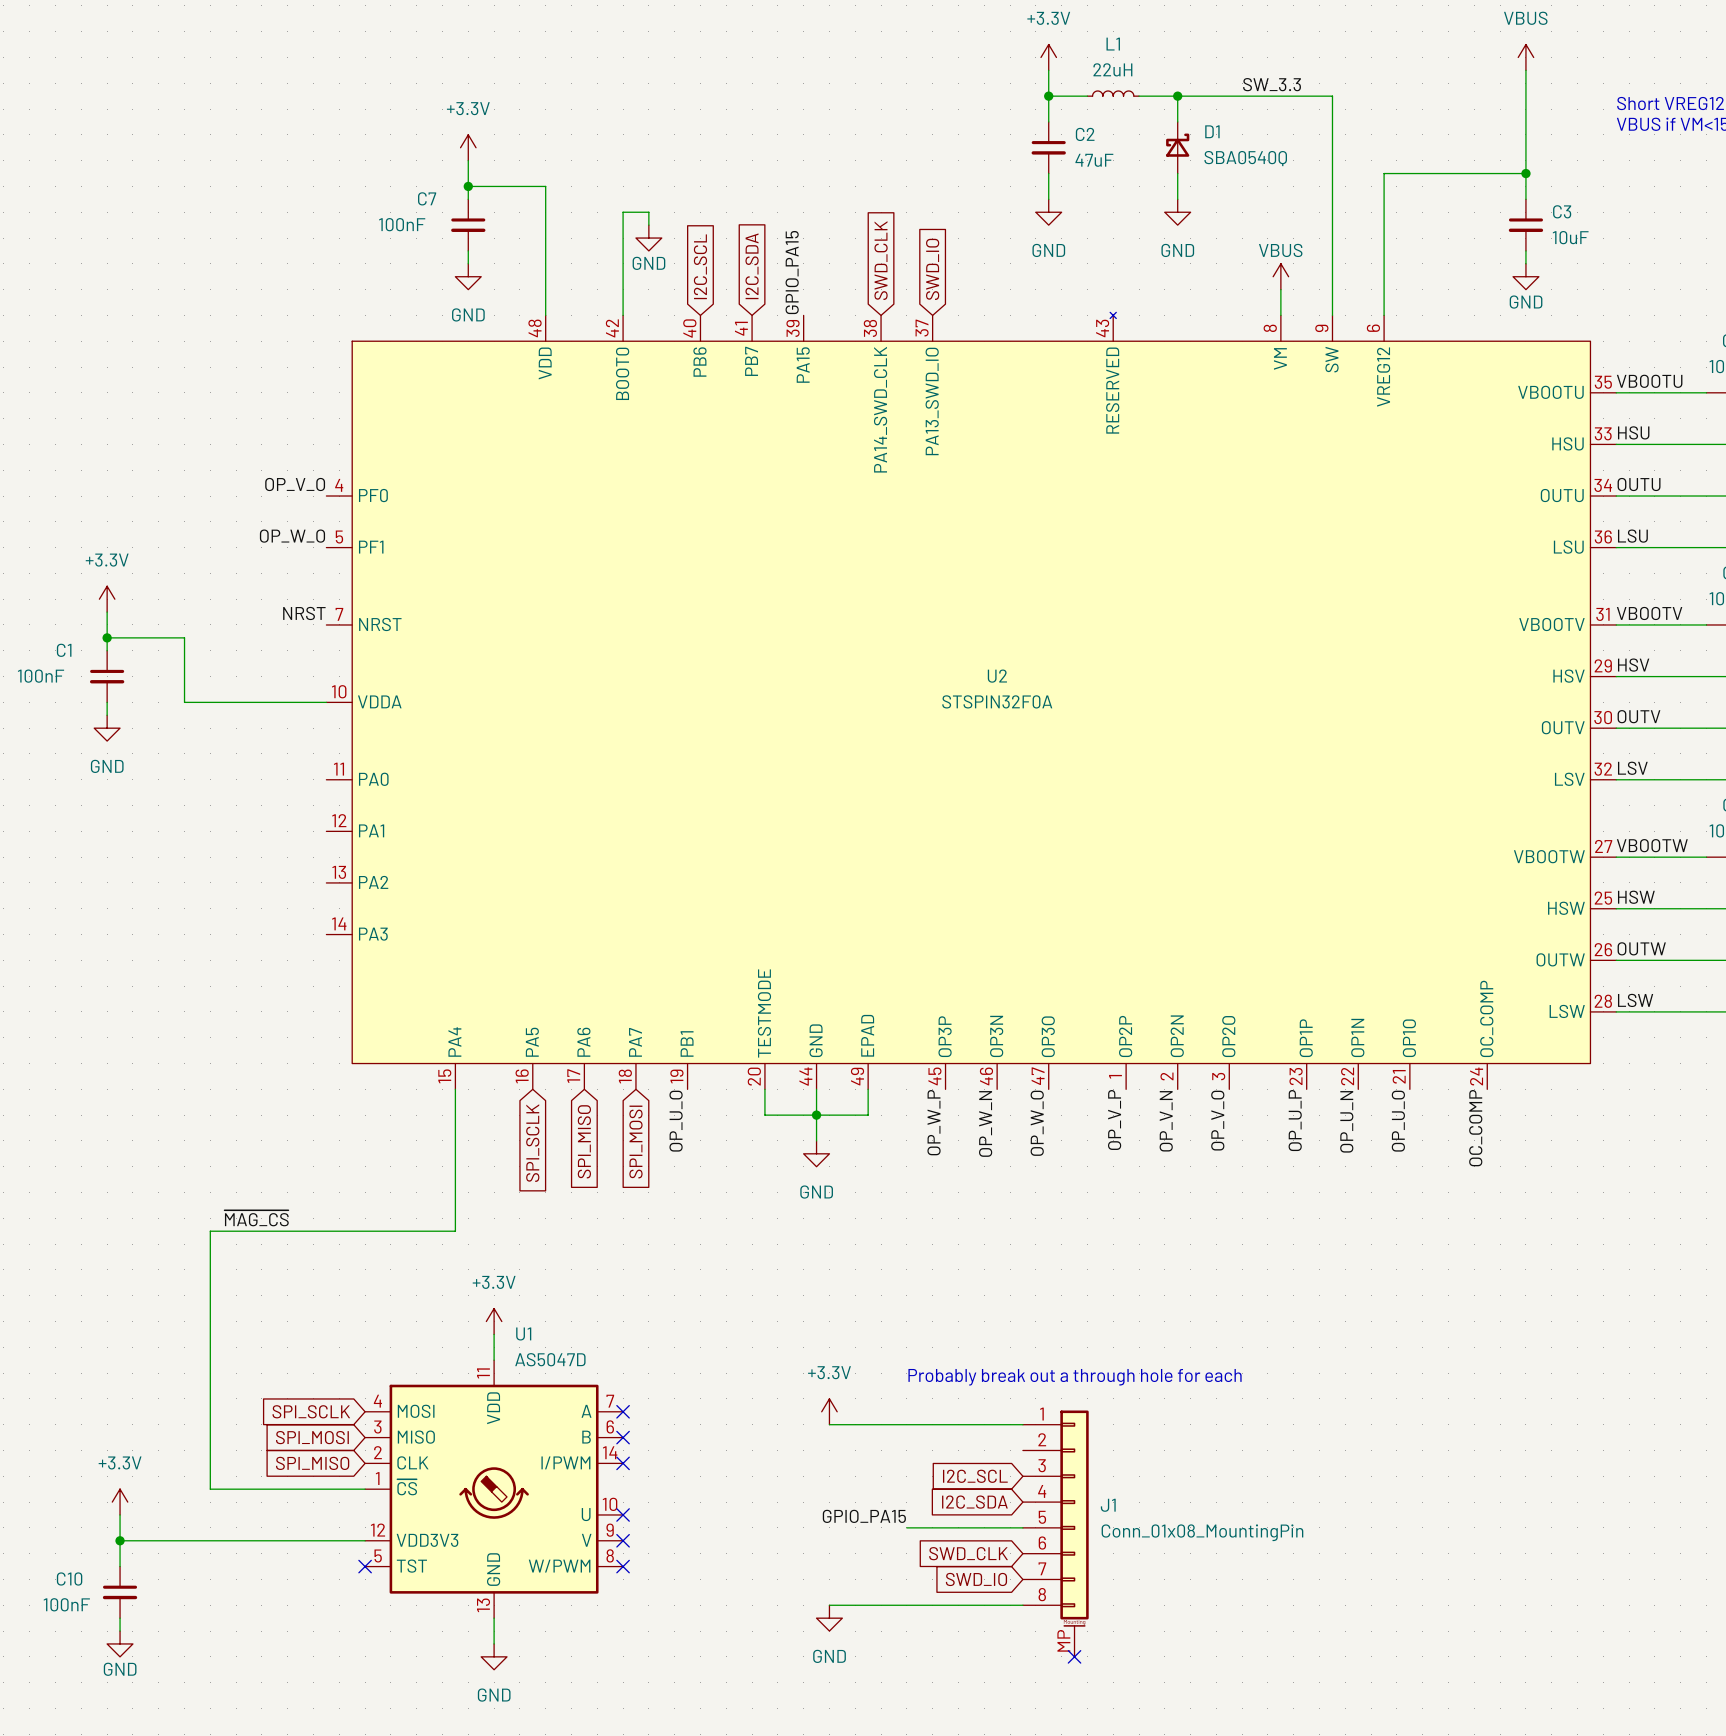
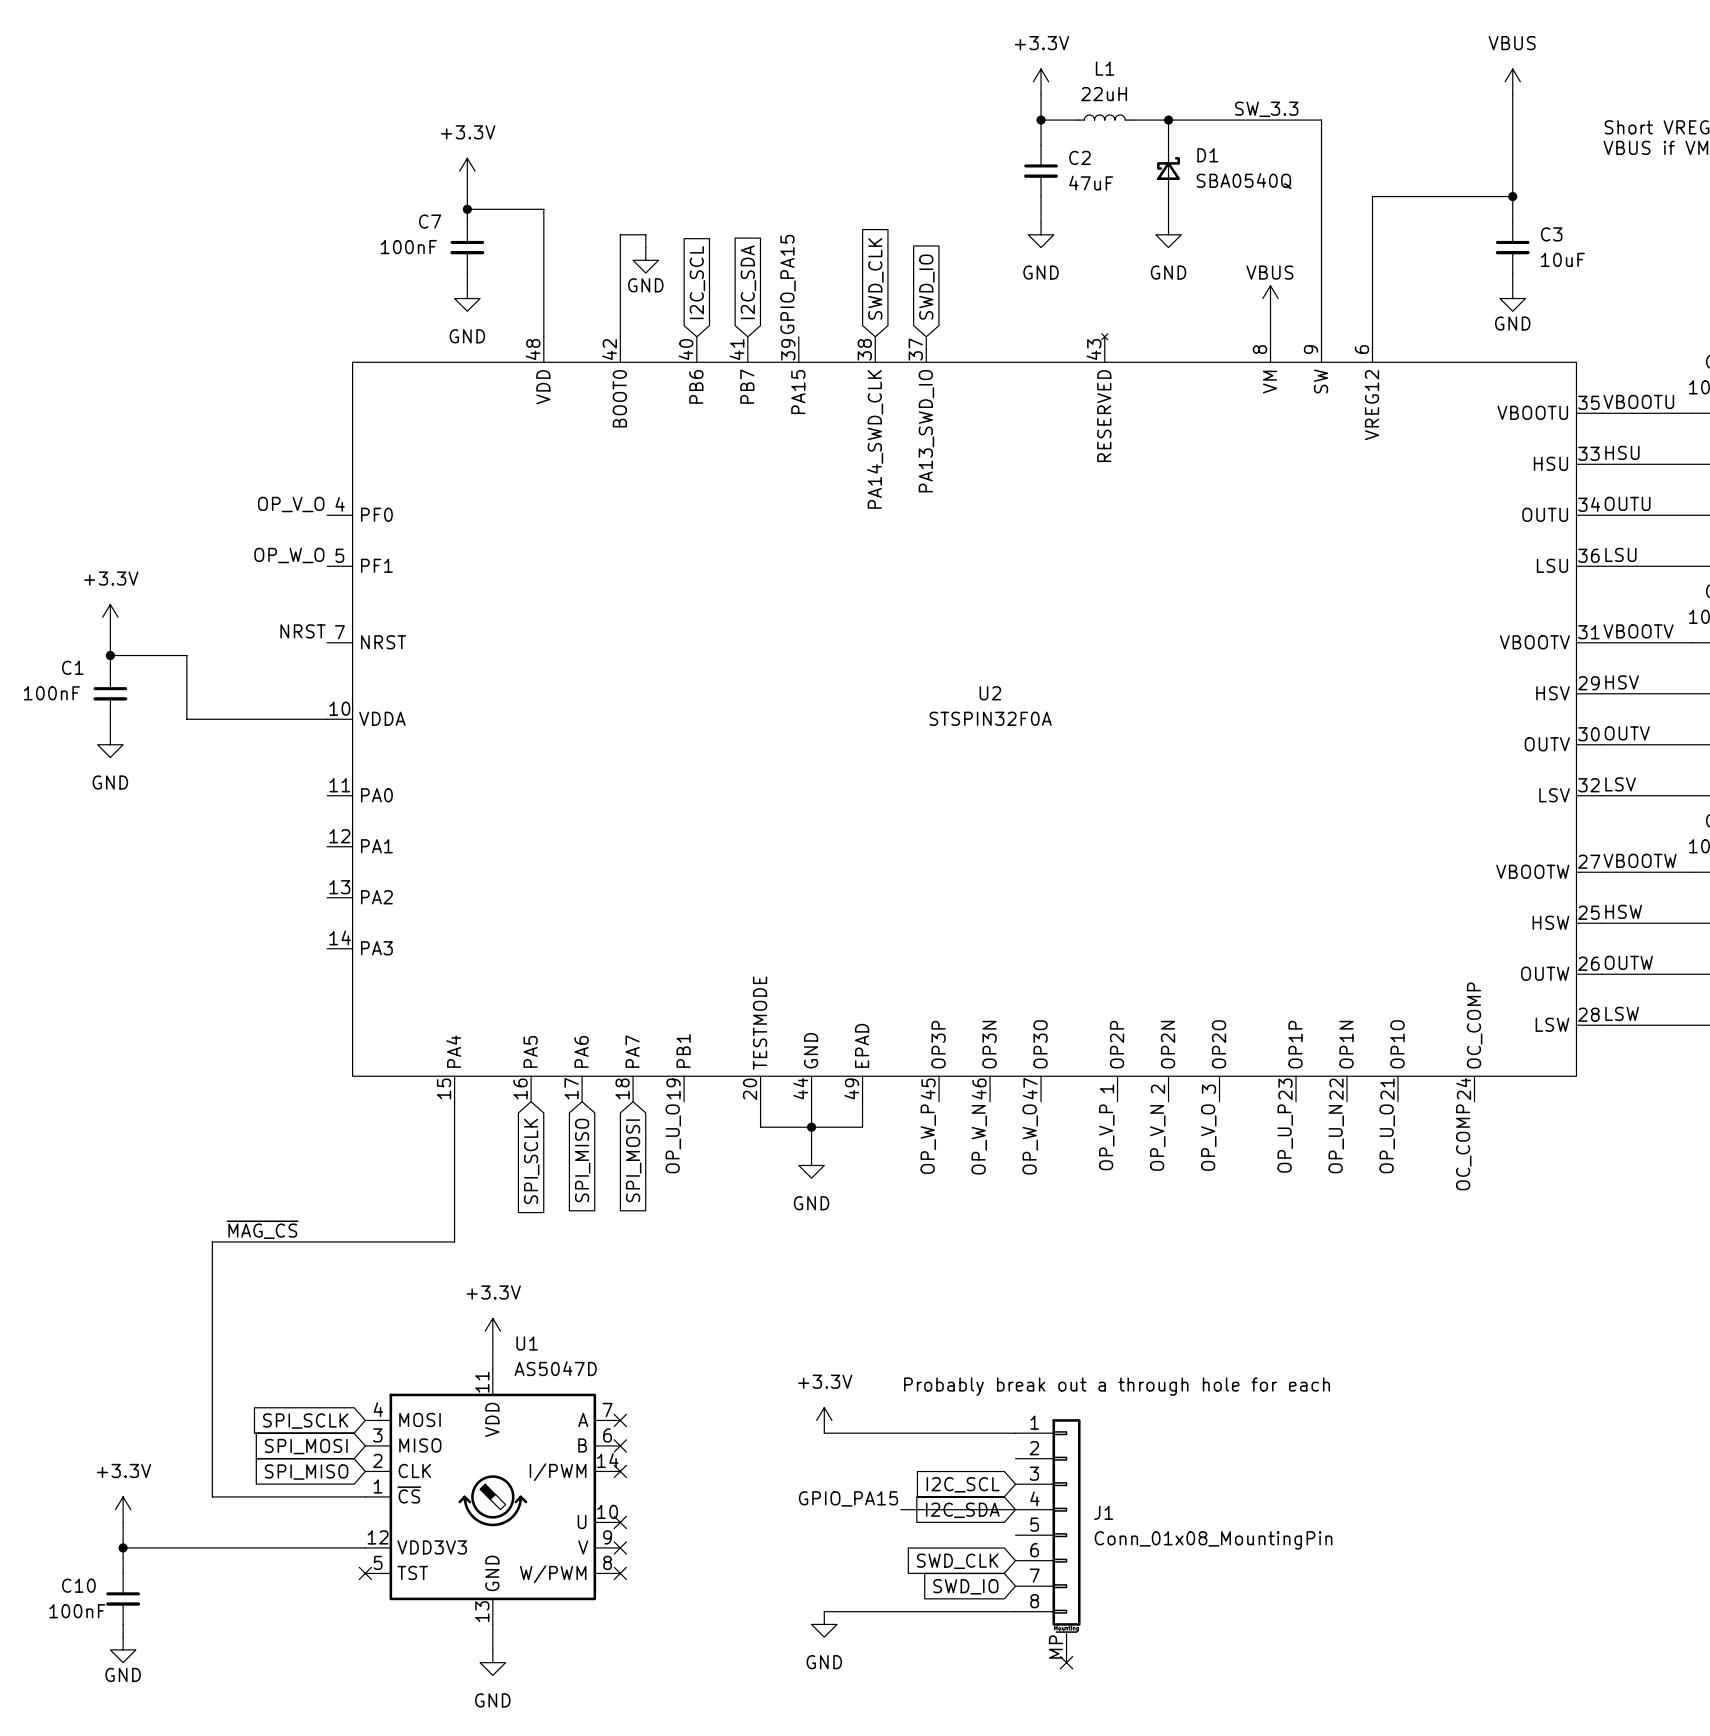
label position: GPIO_PA15 (864, 1516) -> GPIO_PA15 (848, 1498)
wire: (906, 1527) (1022, 1527) -> (900, 1509) (1015, 1509)

